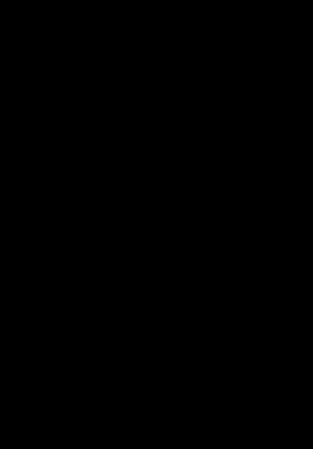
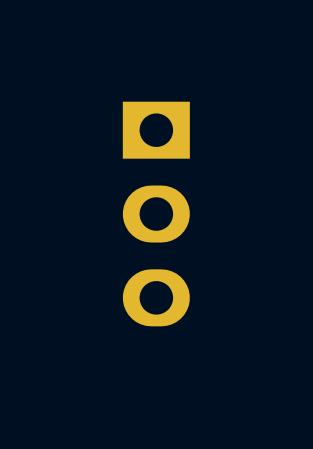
part: none -> (156, 214)

